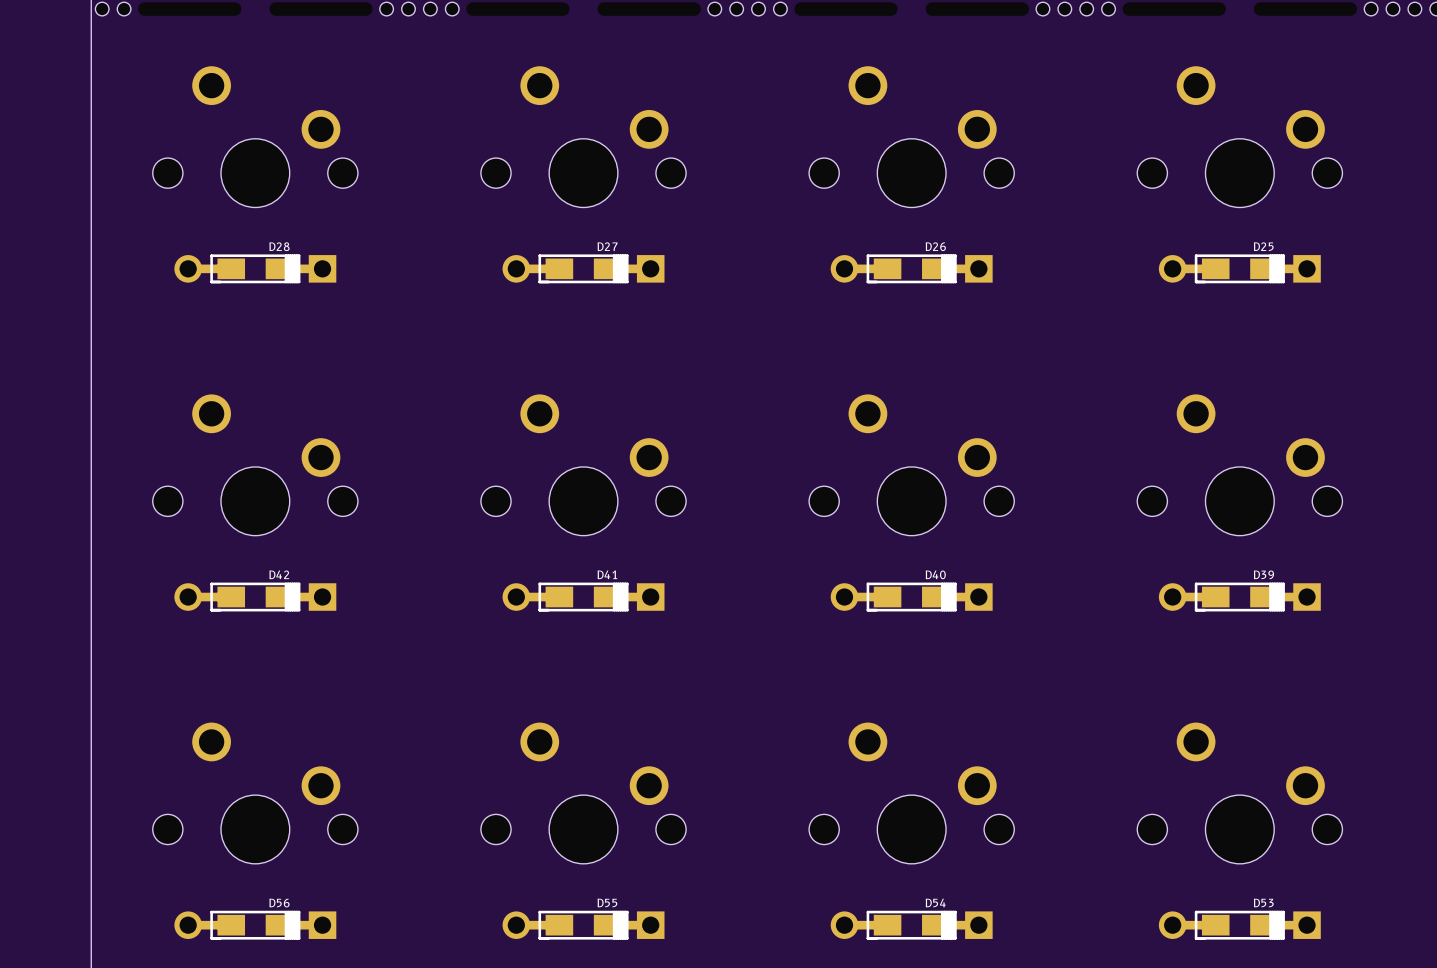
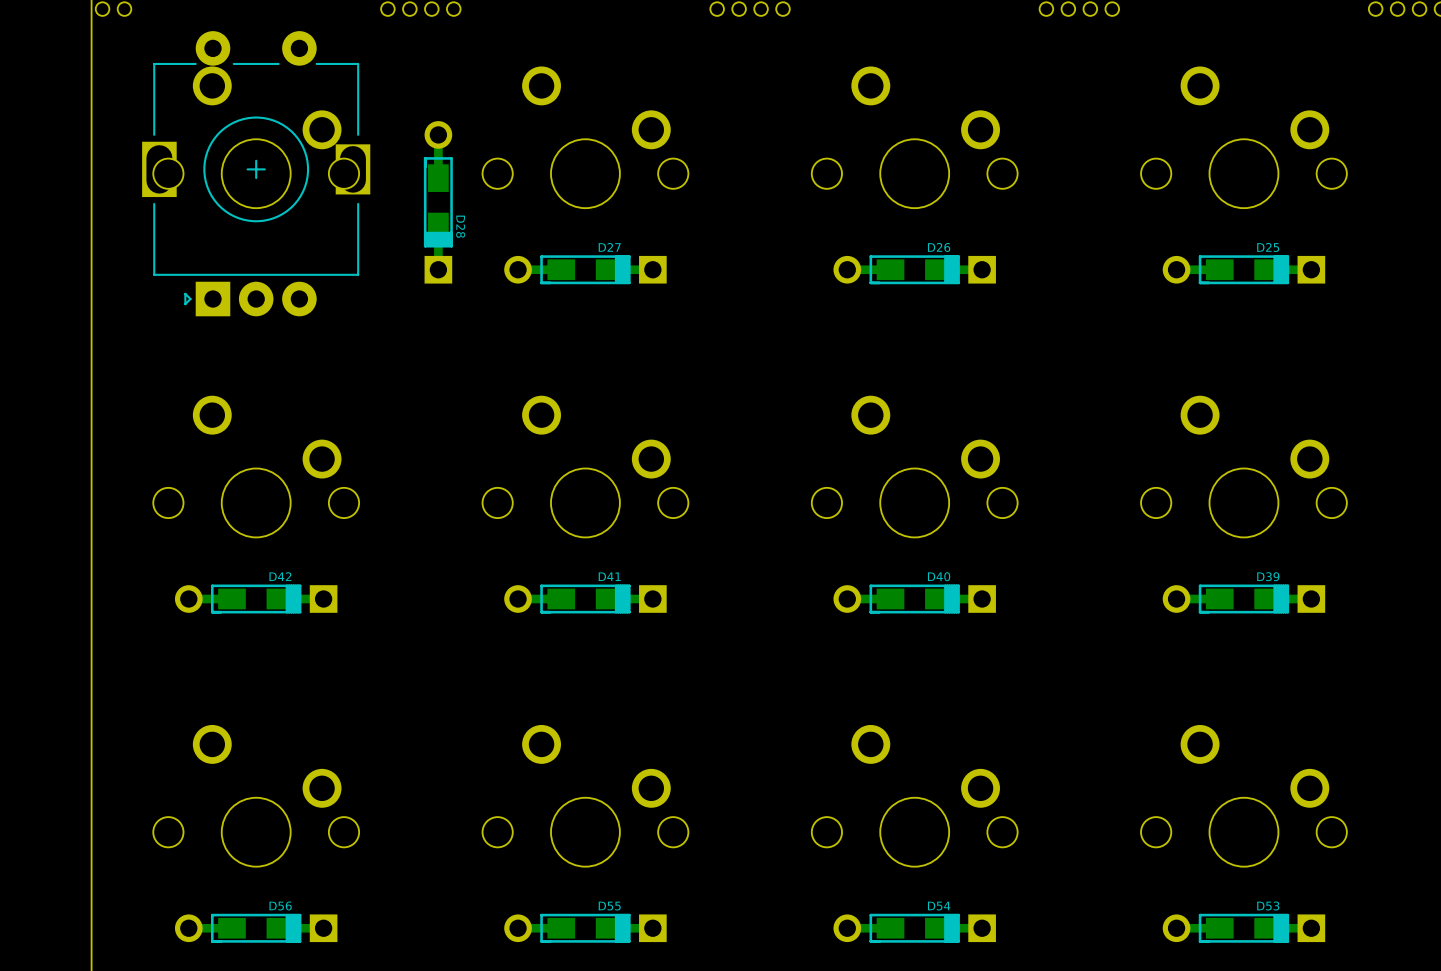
part: none -> (256, 173)
D28 rotation: 0° (255, 268) -> 90° clockwise (438, 202)
D28 position: (255, 268) -> (438, 202)

